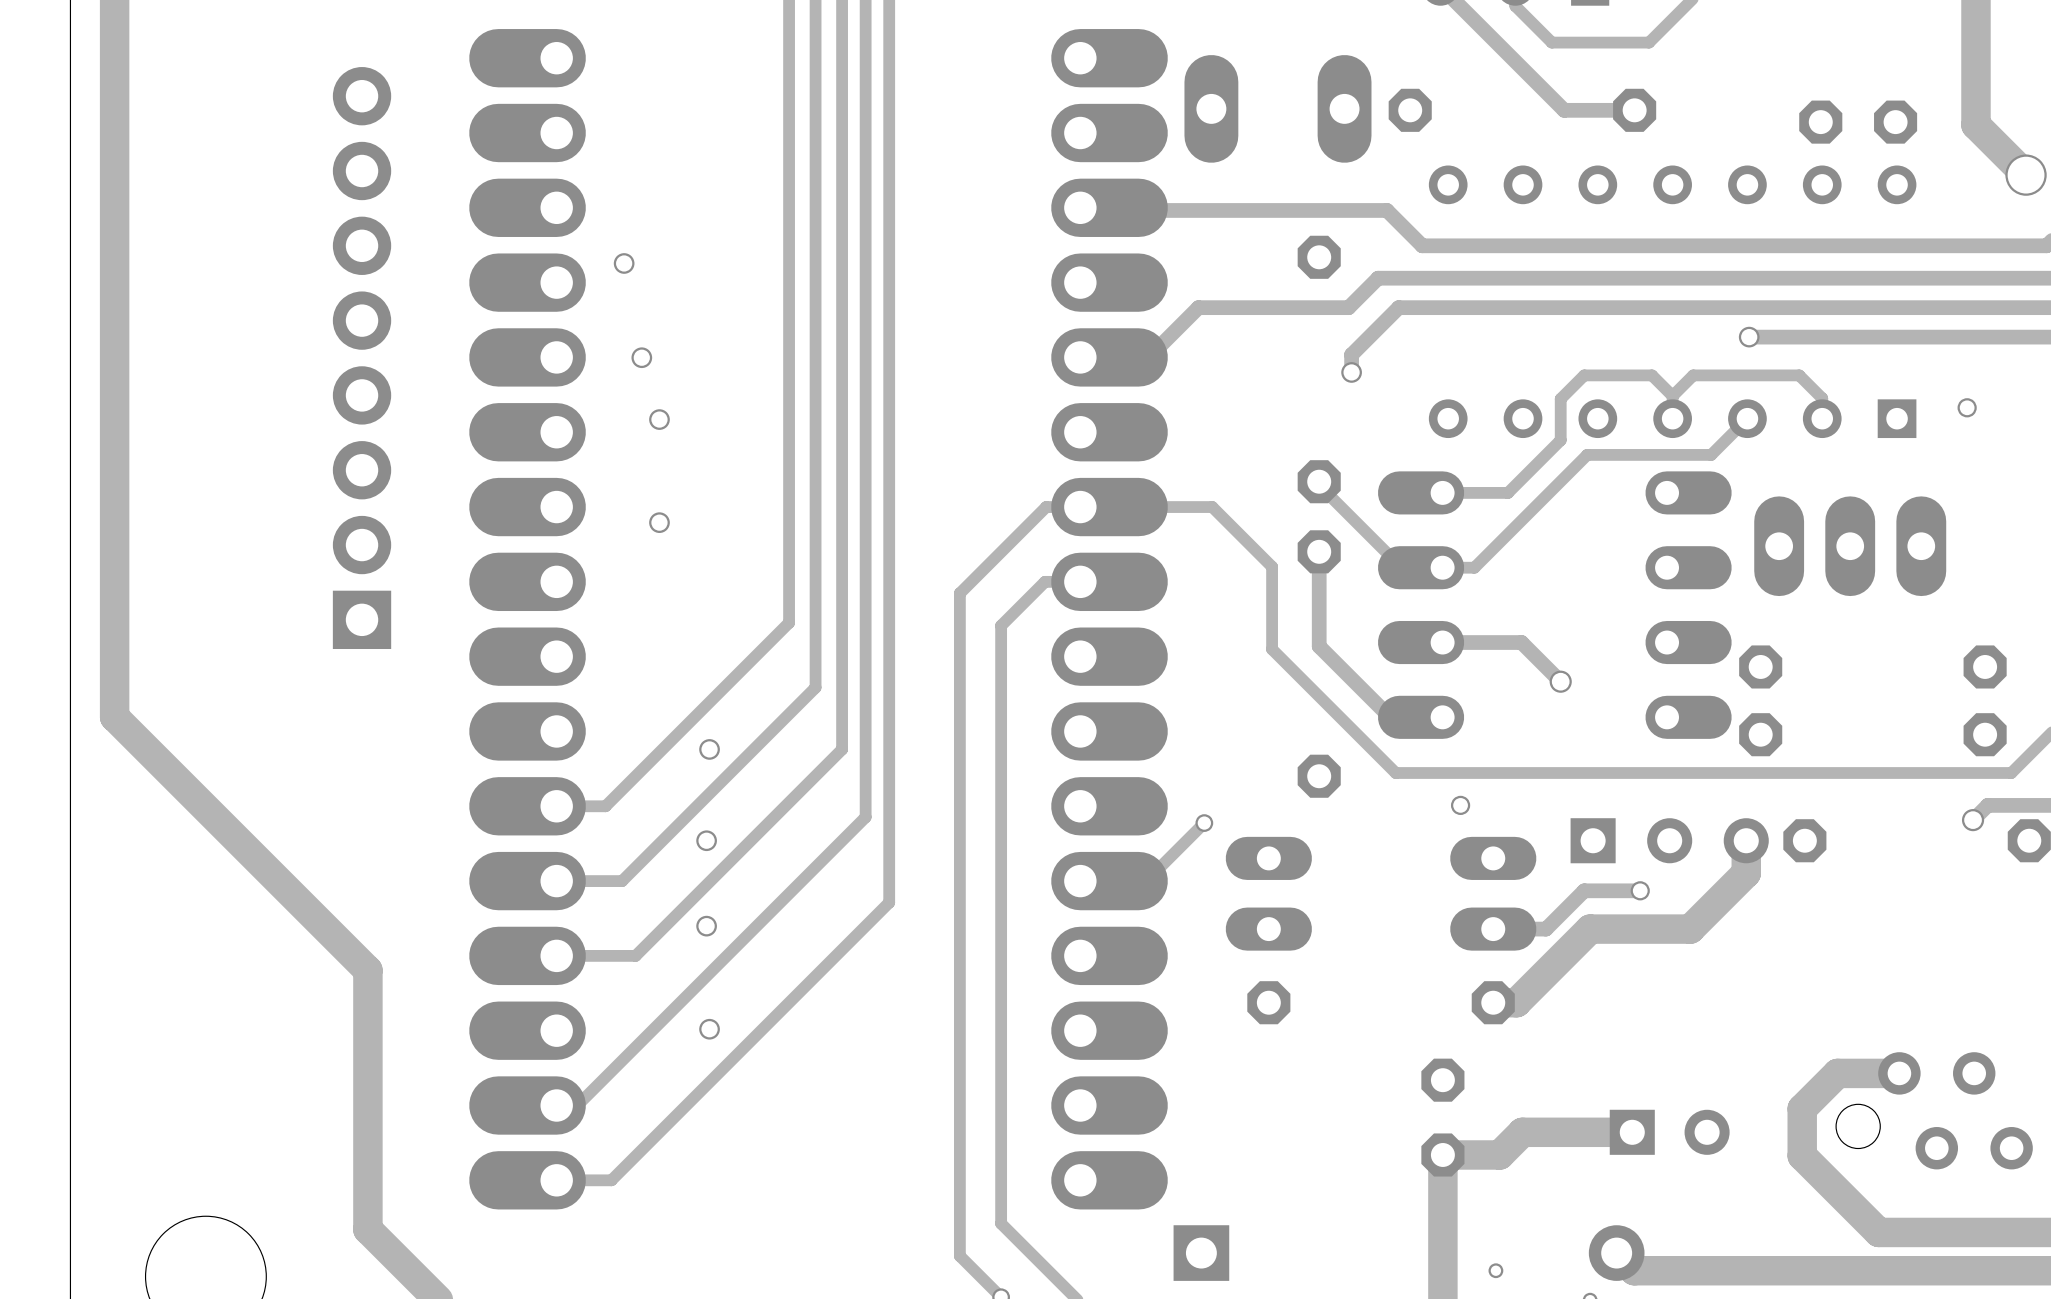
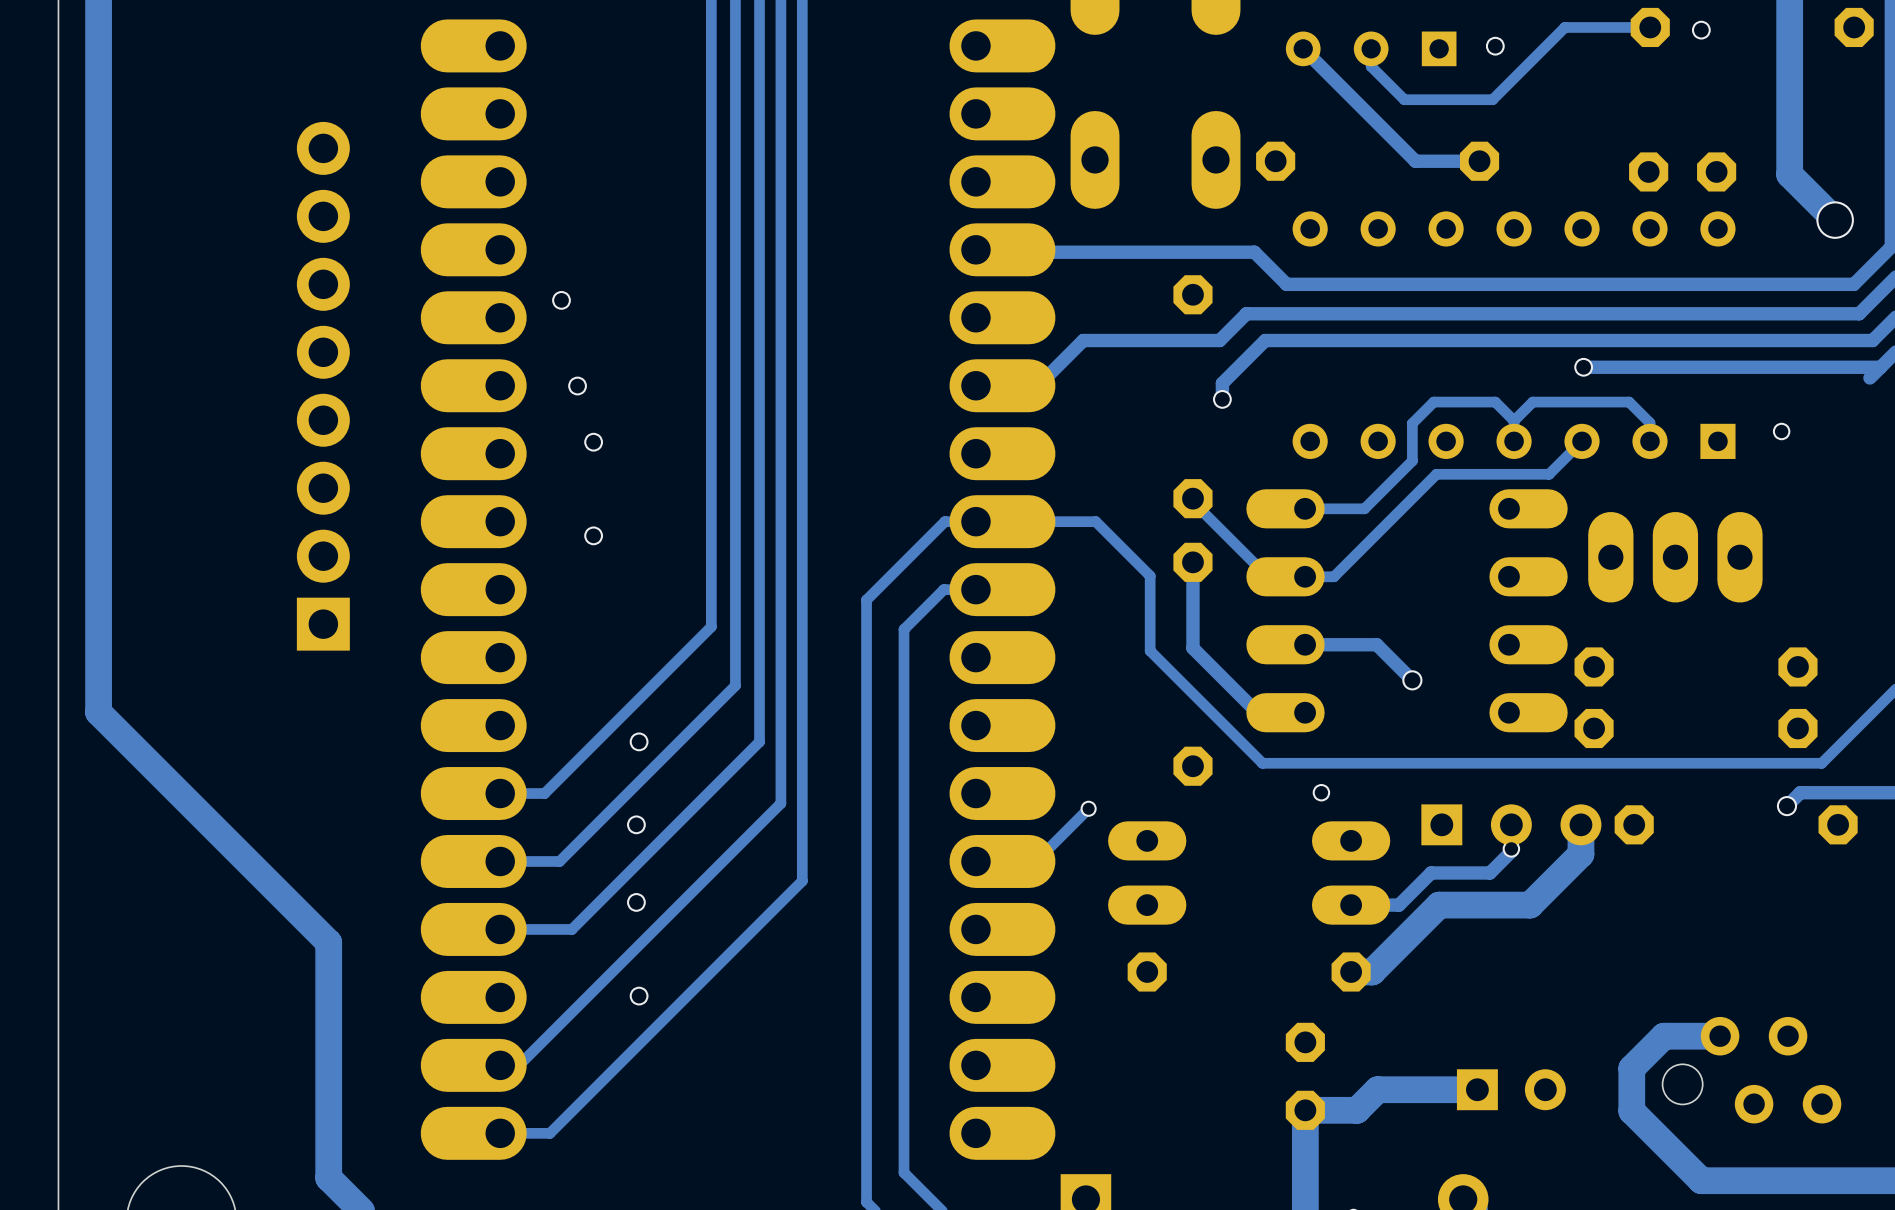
track: (1640, 890) (1584, 890) (1581, 893) -> (1511, 848) (1511, 851) (1489, 872) (1431, 872)
via position: (1640, 890) -> (1511, 848)

